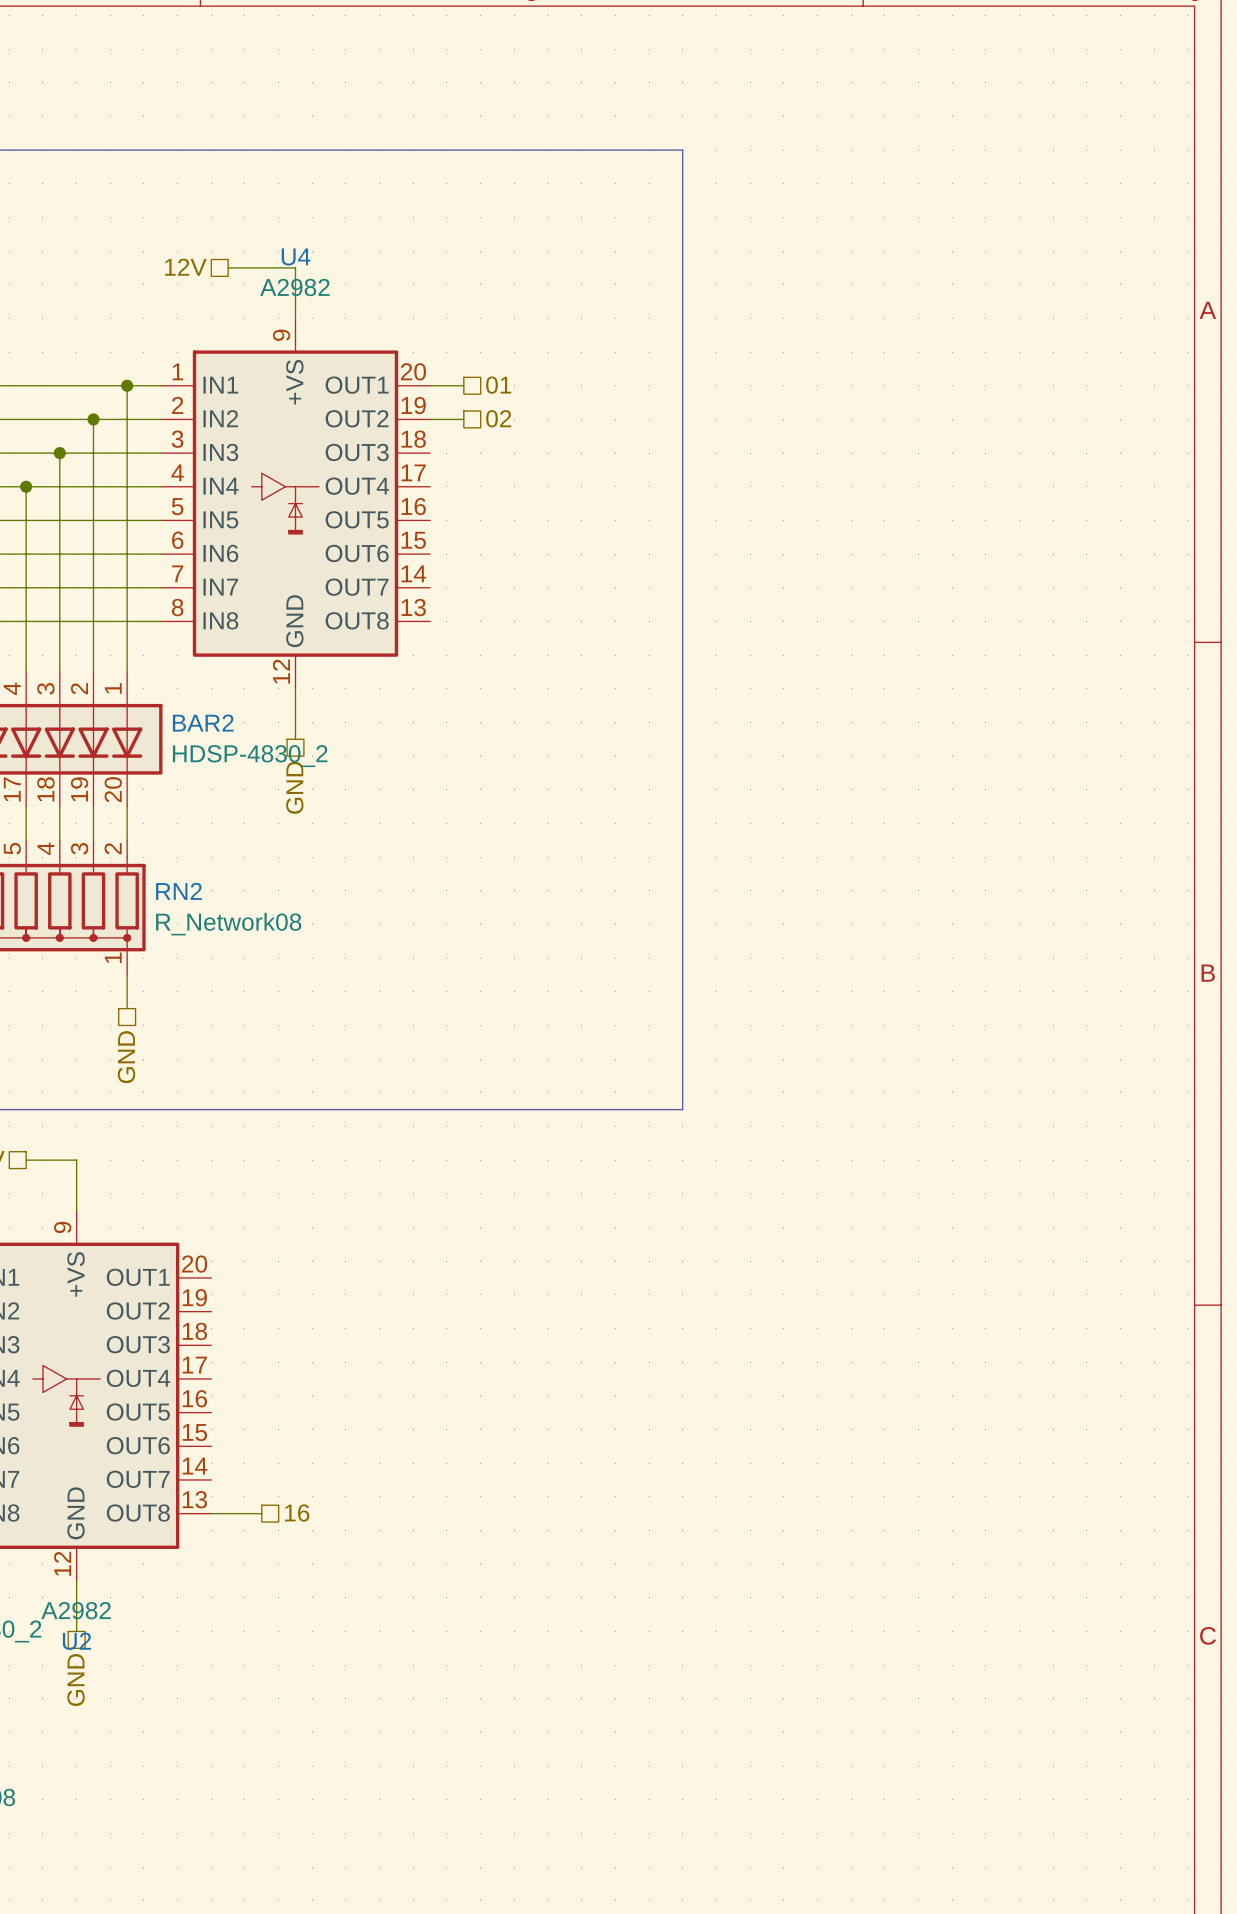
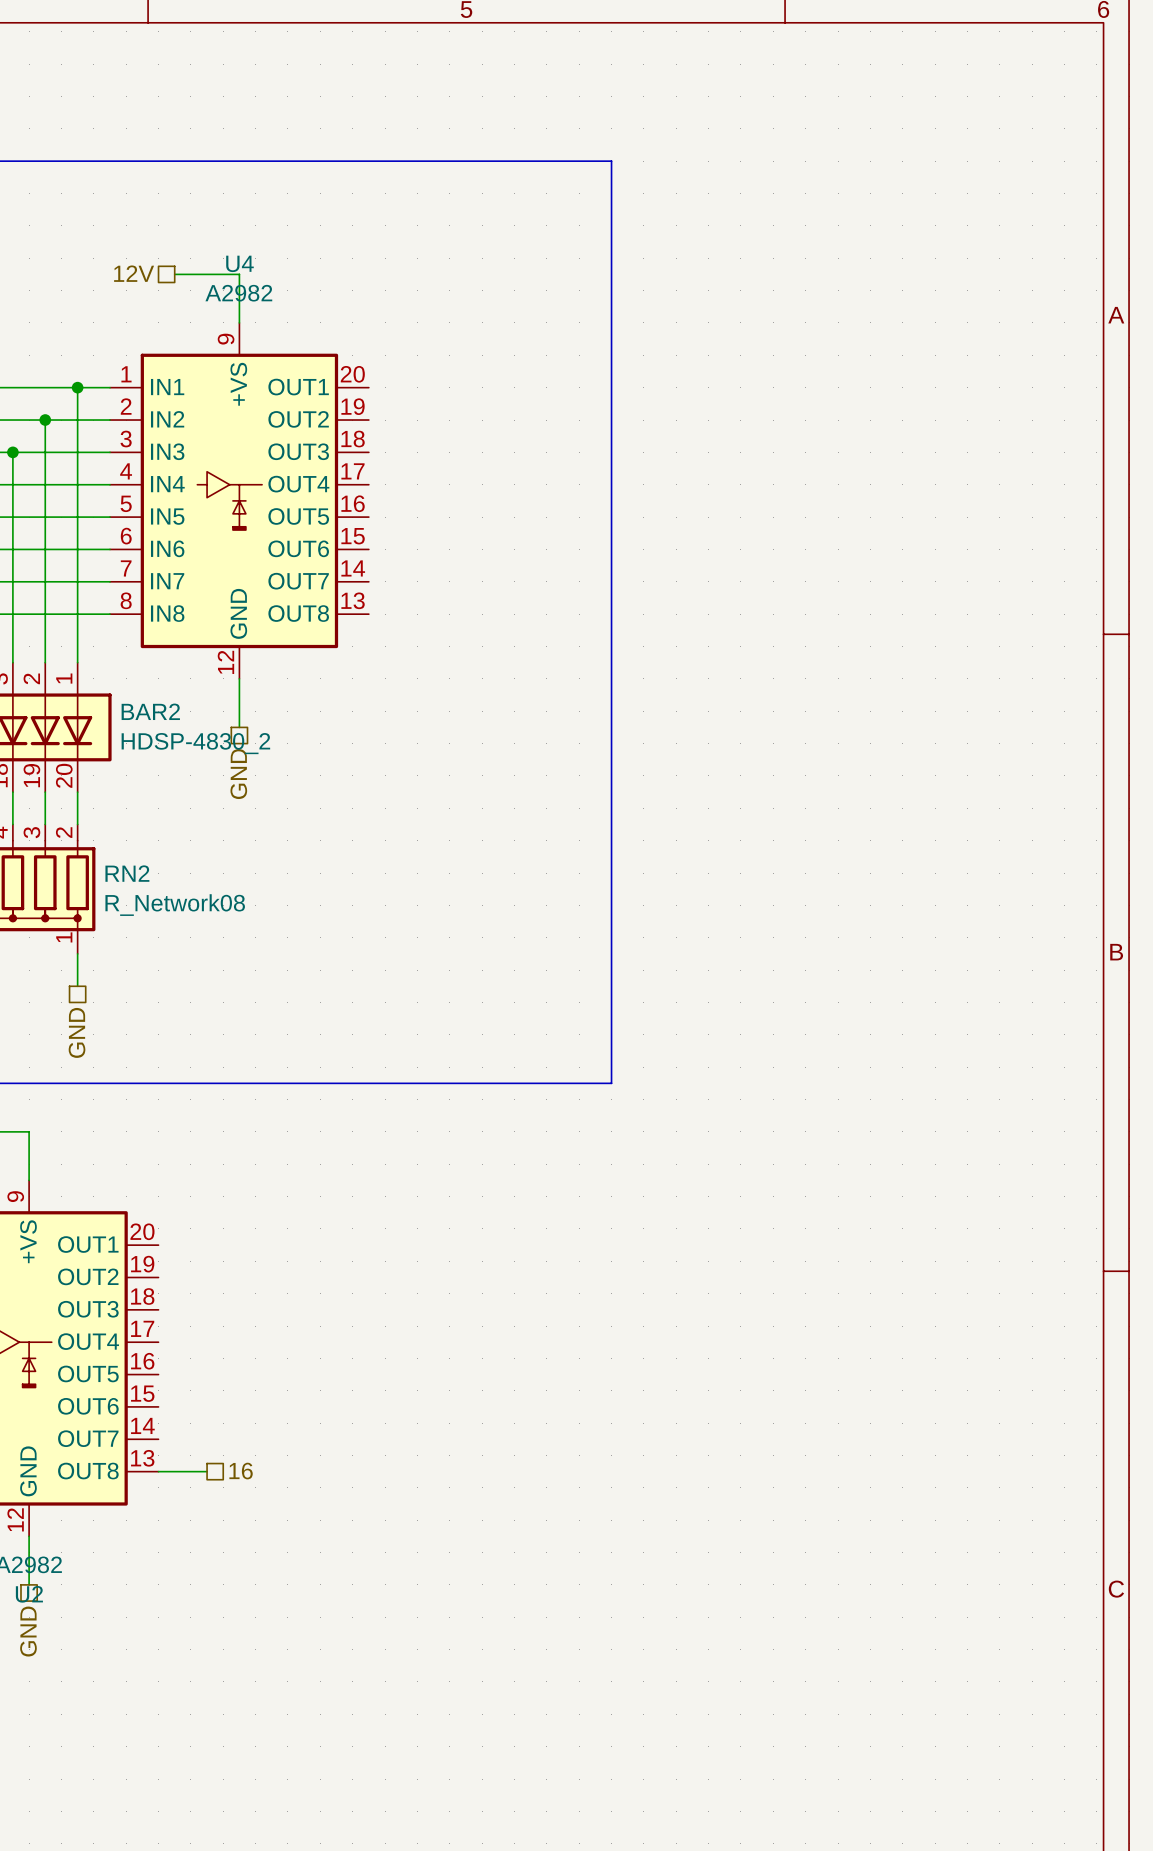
wire: (430, 385) (463, 385) -> none
hierarchical label: 01 (498, 385) -> none
hierarchical label: 02 (498, 418) -> none
wire: (430, 419) (463, 419) -> none

